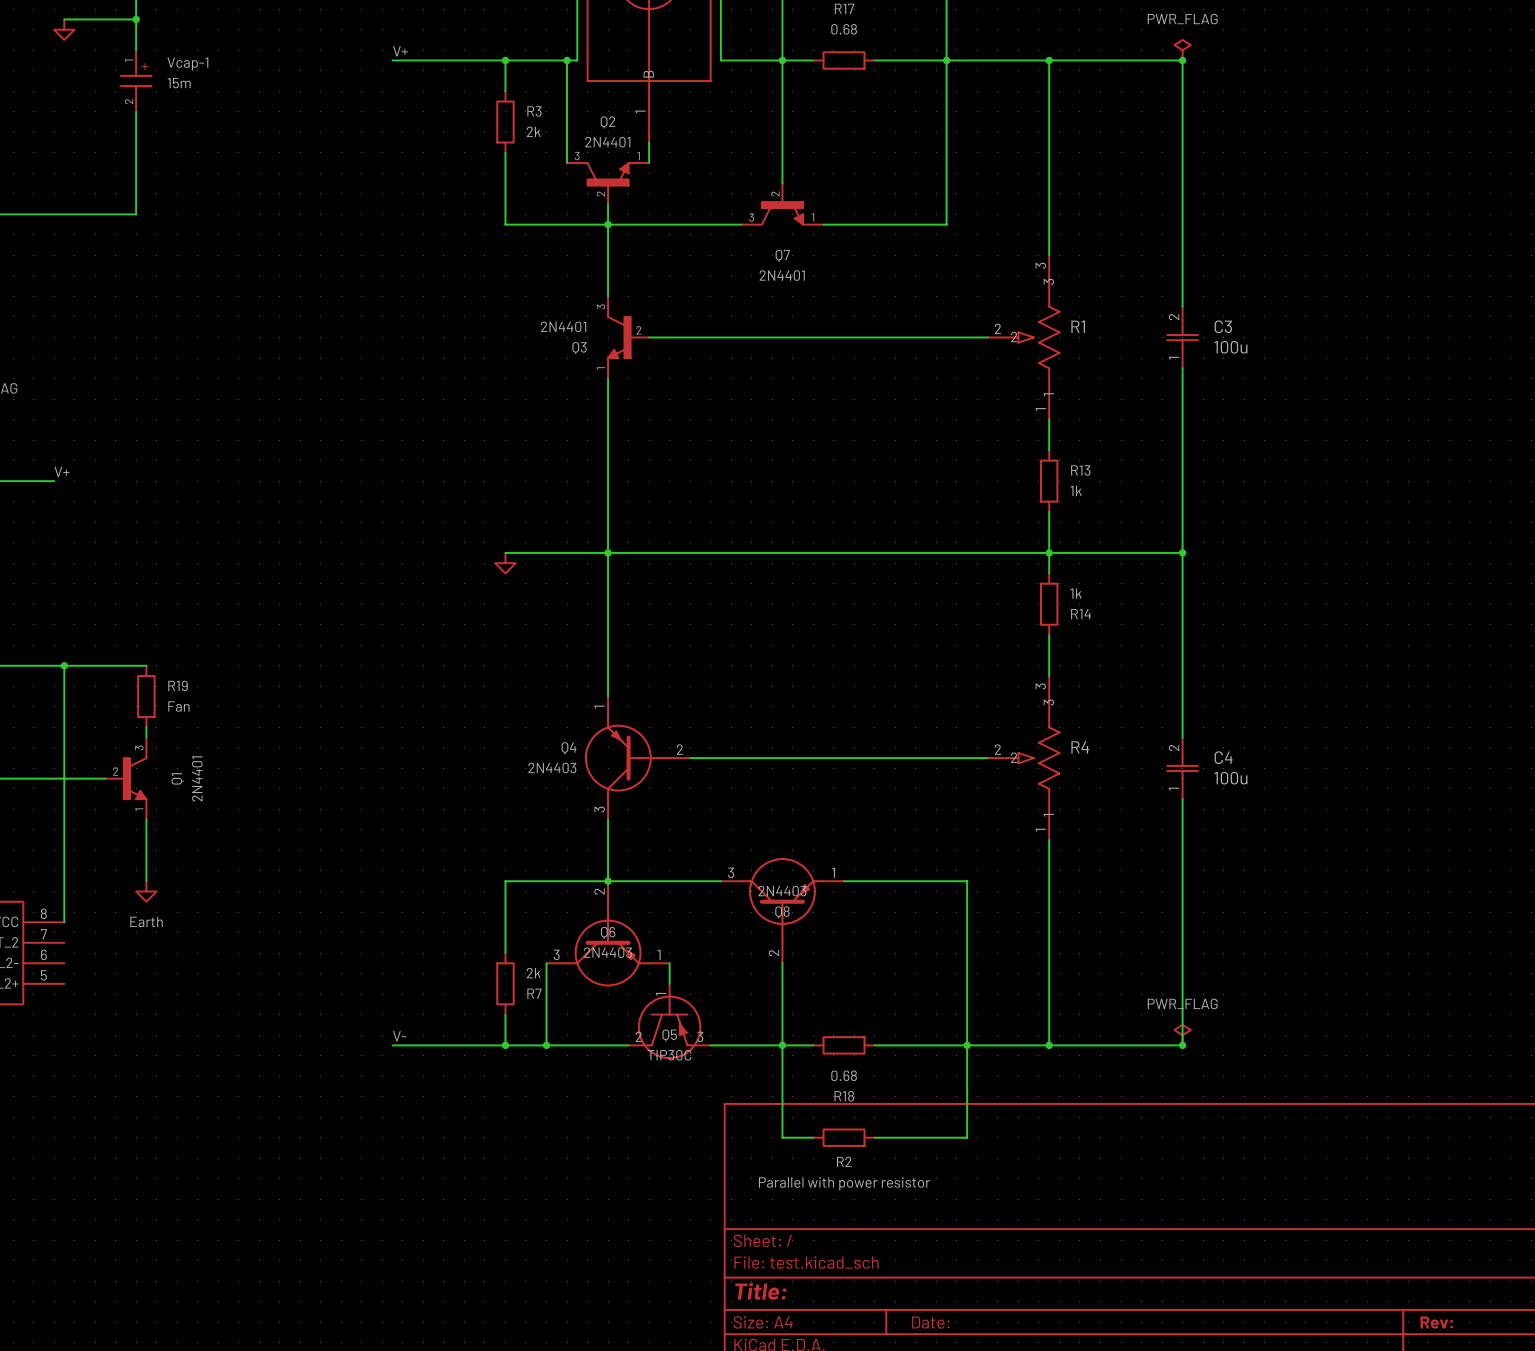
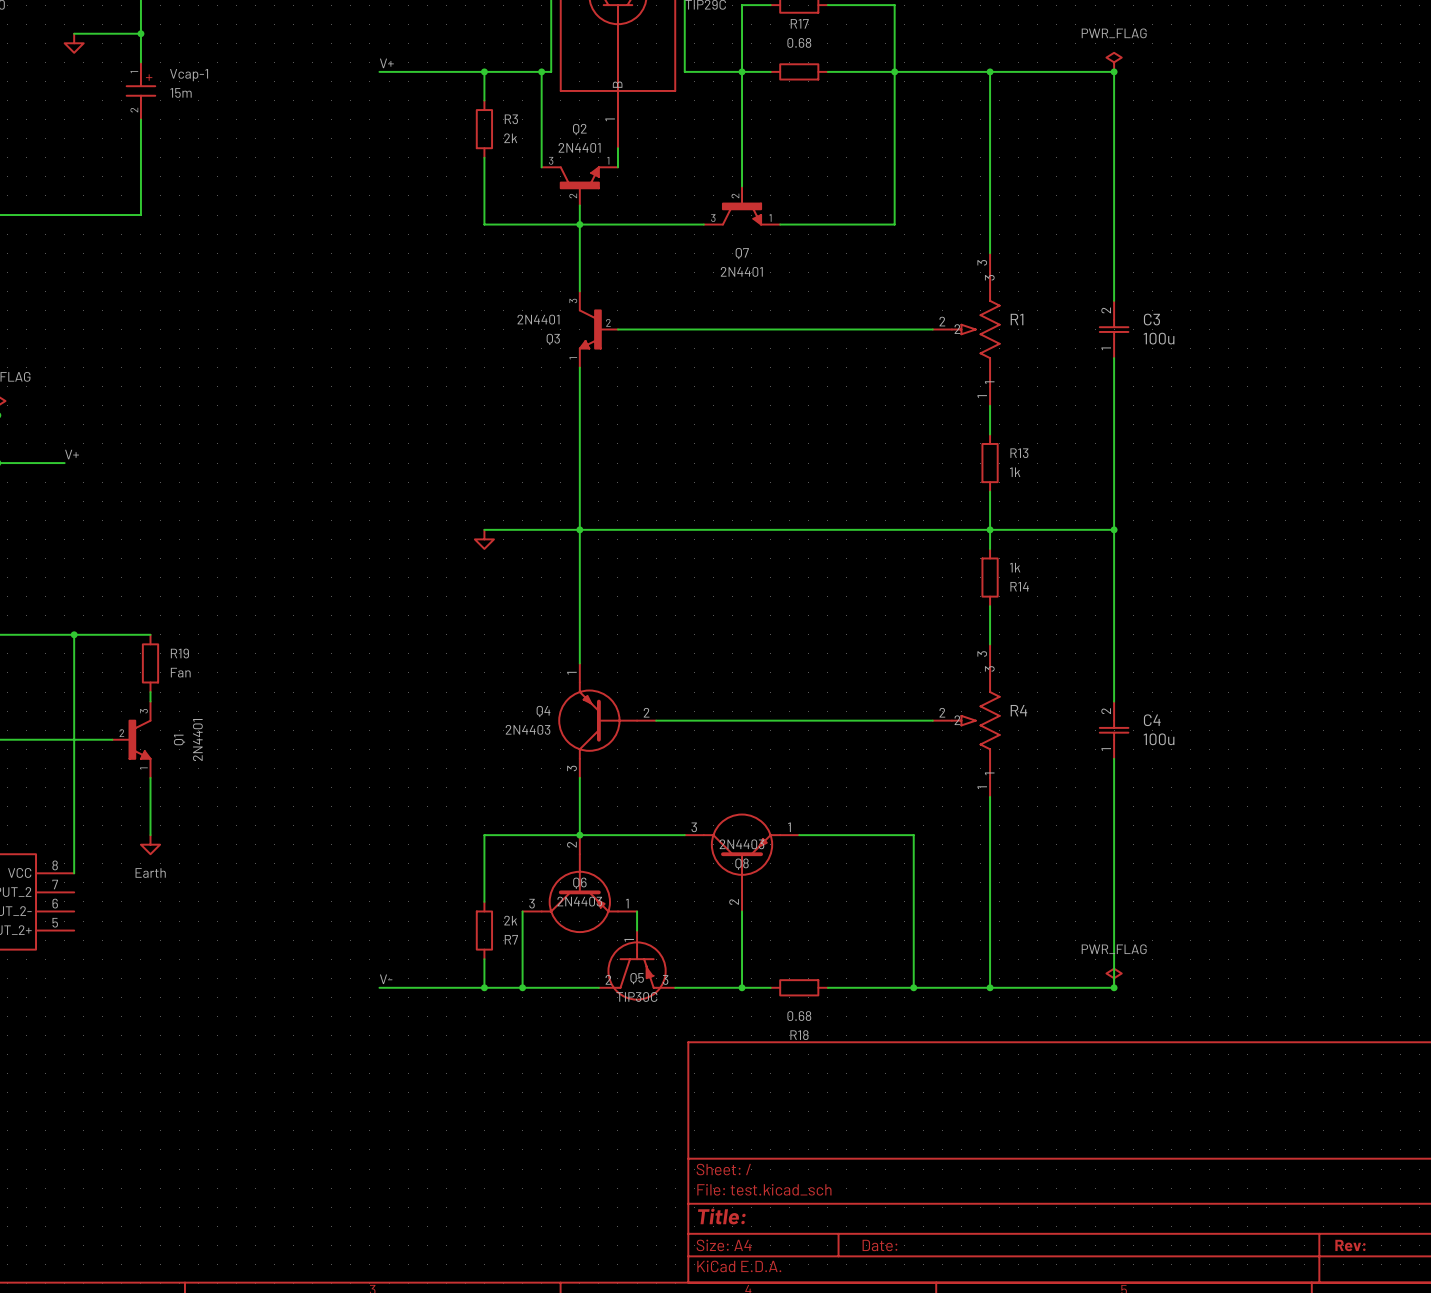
wire: (782, 1045) (782, 1137) (813, 1137) -> none
wire: (967, 1045) (967, 1137) (874, 1137) -> none
R2: Parallel with power resistor (844, 1137) -> none

